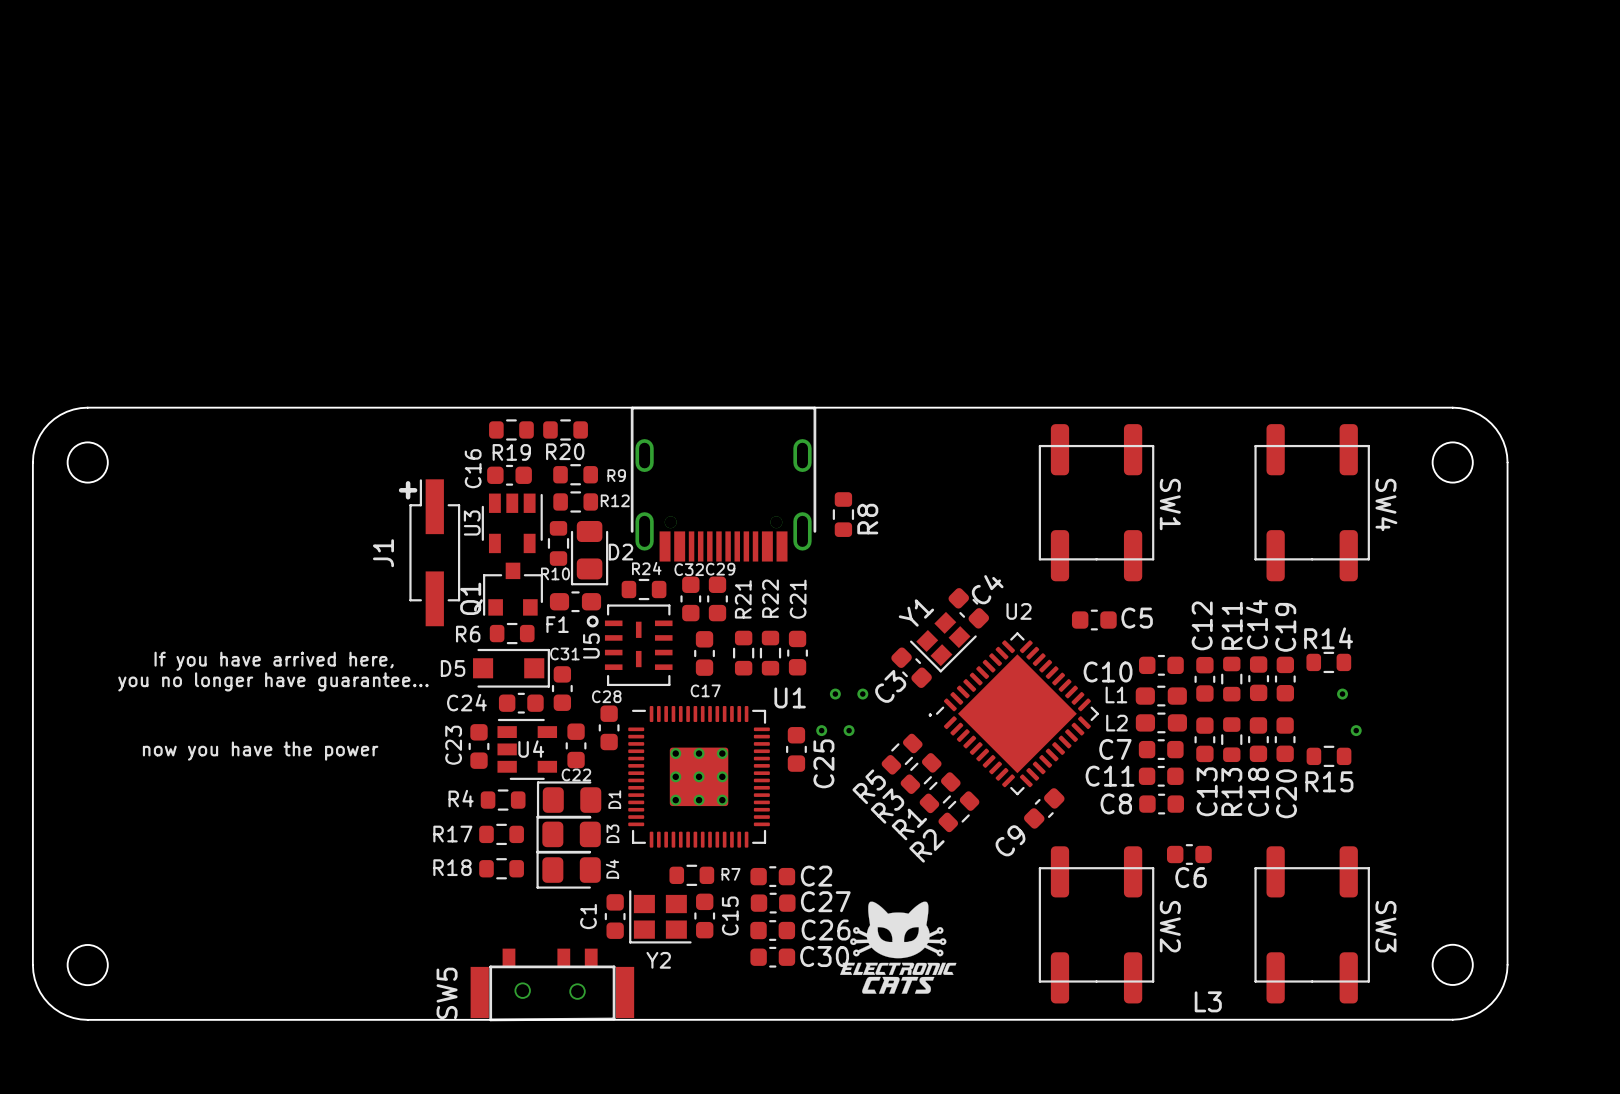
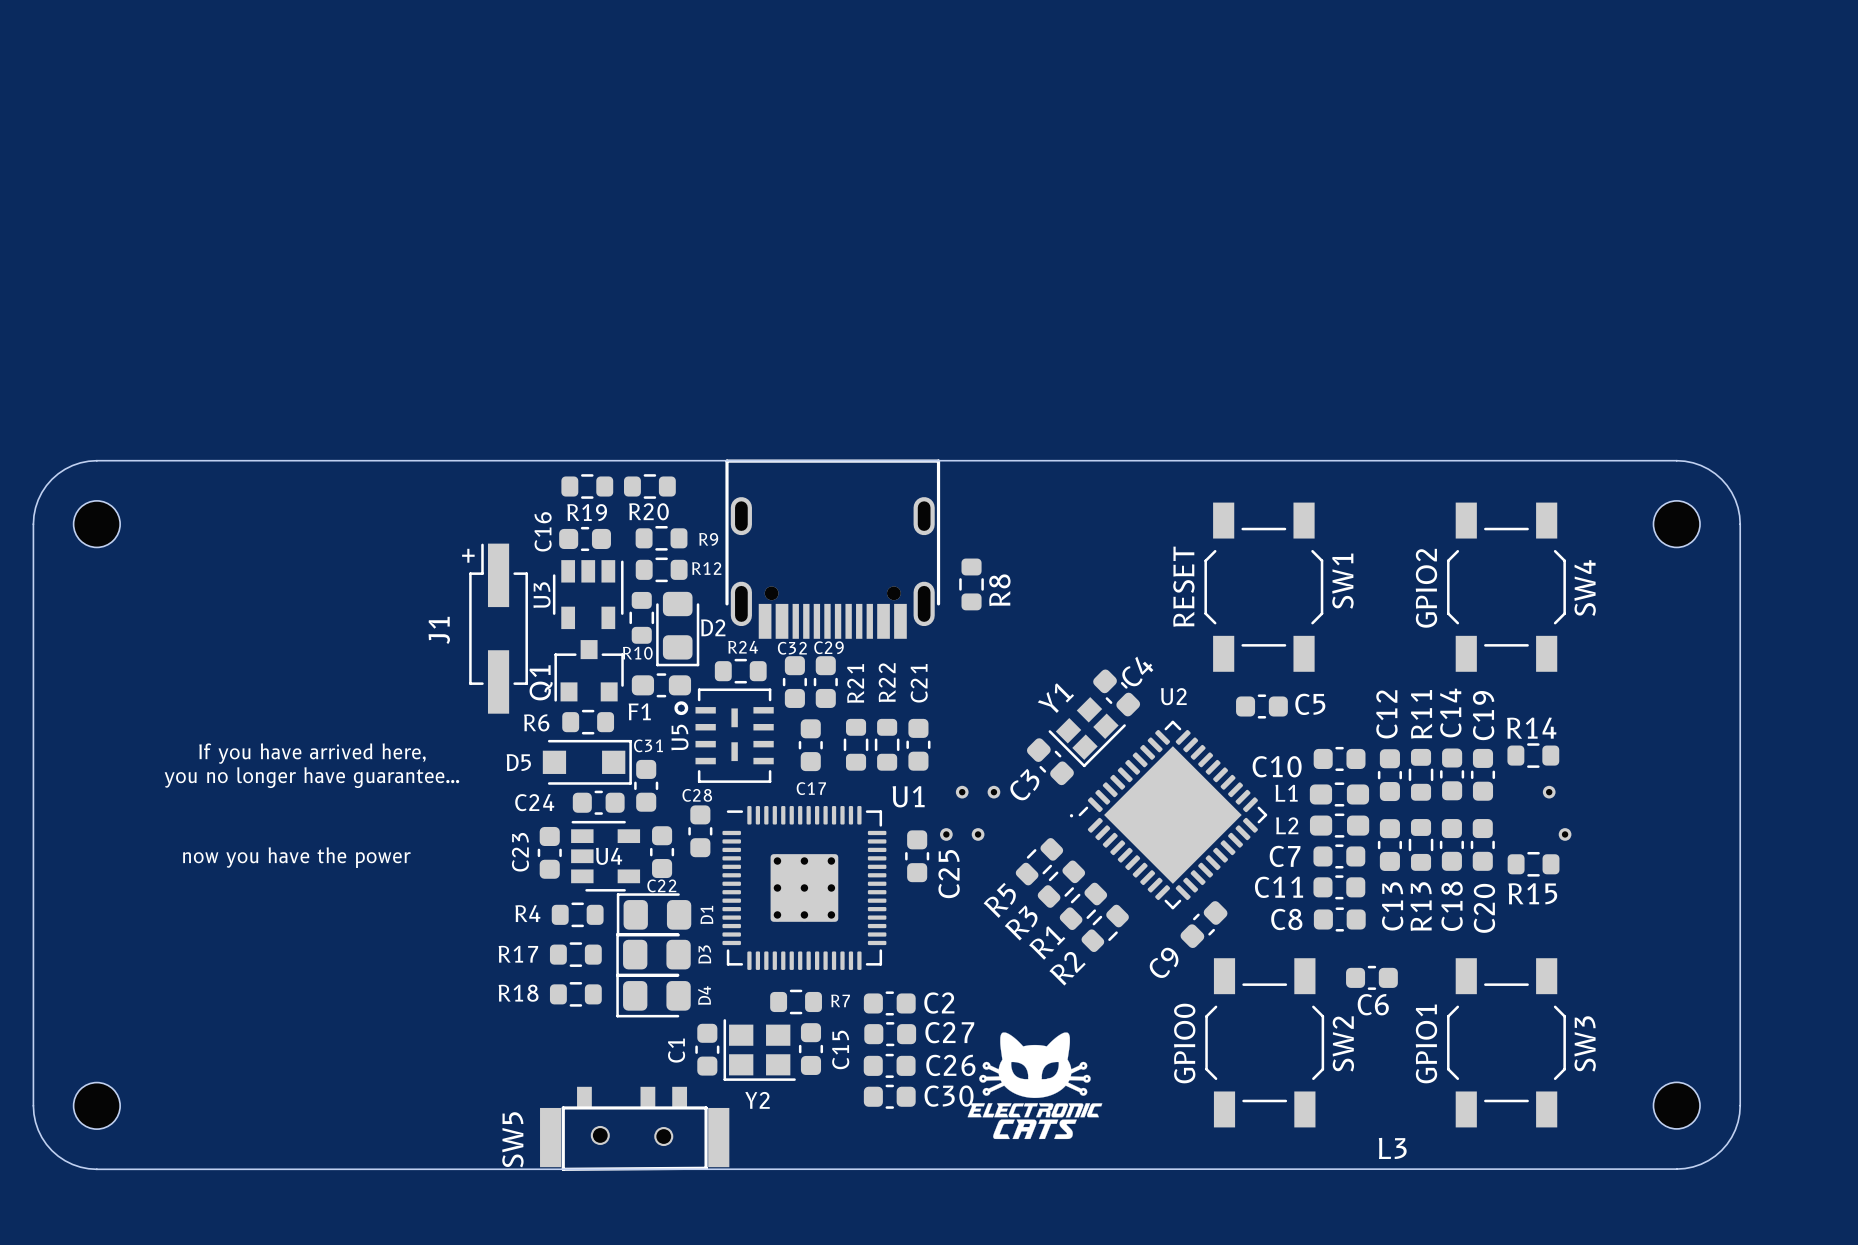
SW1 footprint: [1038, 424, 1155, 582] -> [1204, 502, 1324, 672]
SW4 footprint: [1254, 424, 1370, 582] -> [1447, 502, 1566, 672]
SW1 value: none -> RESET (1183, 586)
SW4 value: none -> GPIO2 (1426, 588)
SW2 footprint: [1038, 846, 1155, 1004] -> [1205, 958, 1325, 1128]
SW3 footprint: [1254, 846, 1370, 1004] -> [1447, 958, 1566, 1128]
SW2 value: none -> GPIO0 (1184, 1043)
SW3 value: none -> GPIO1 (1426, 1043)

